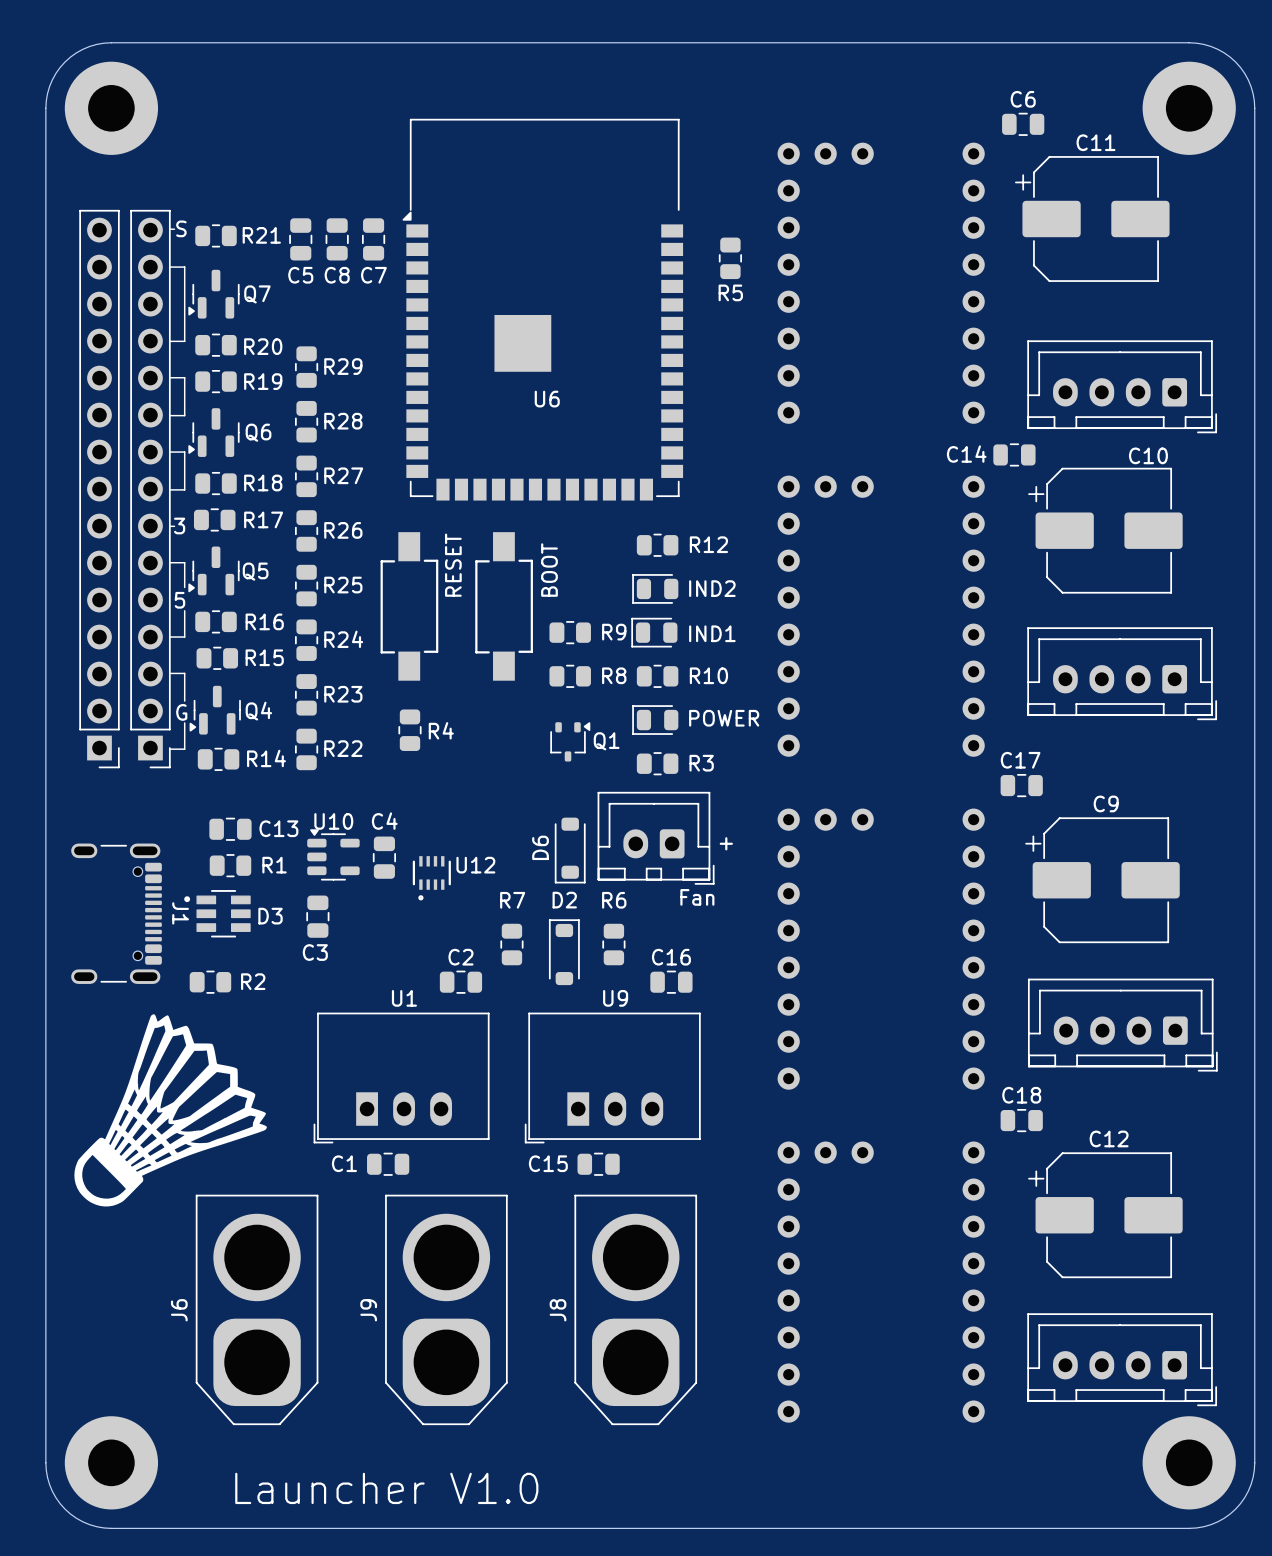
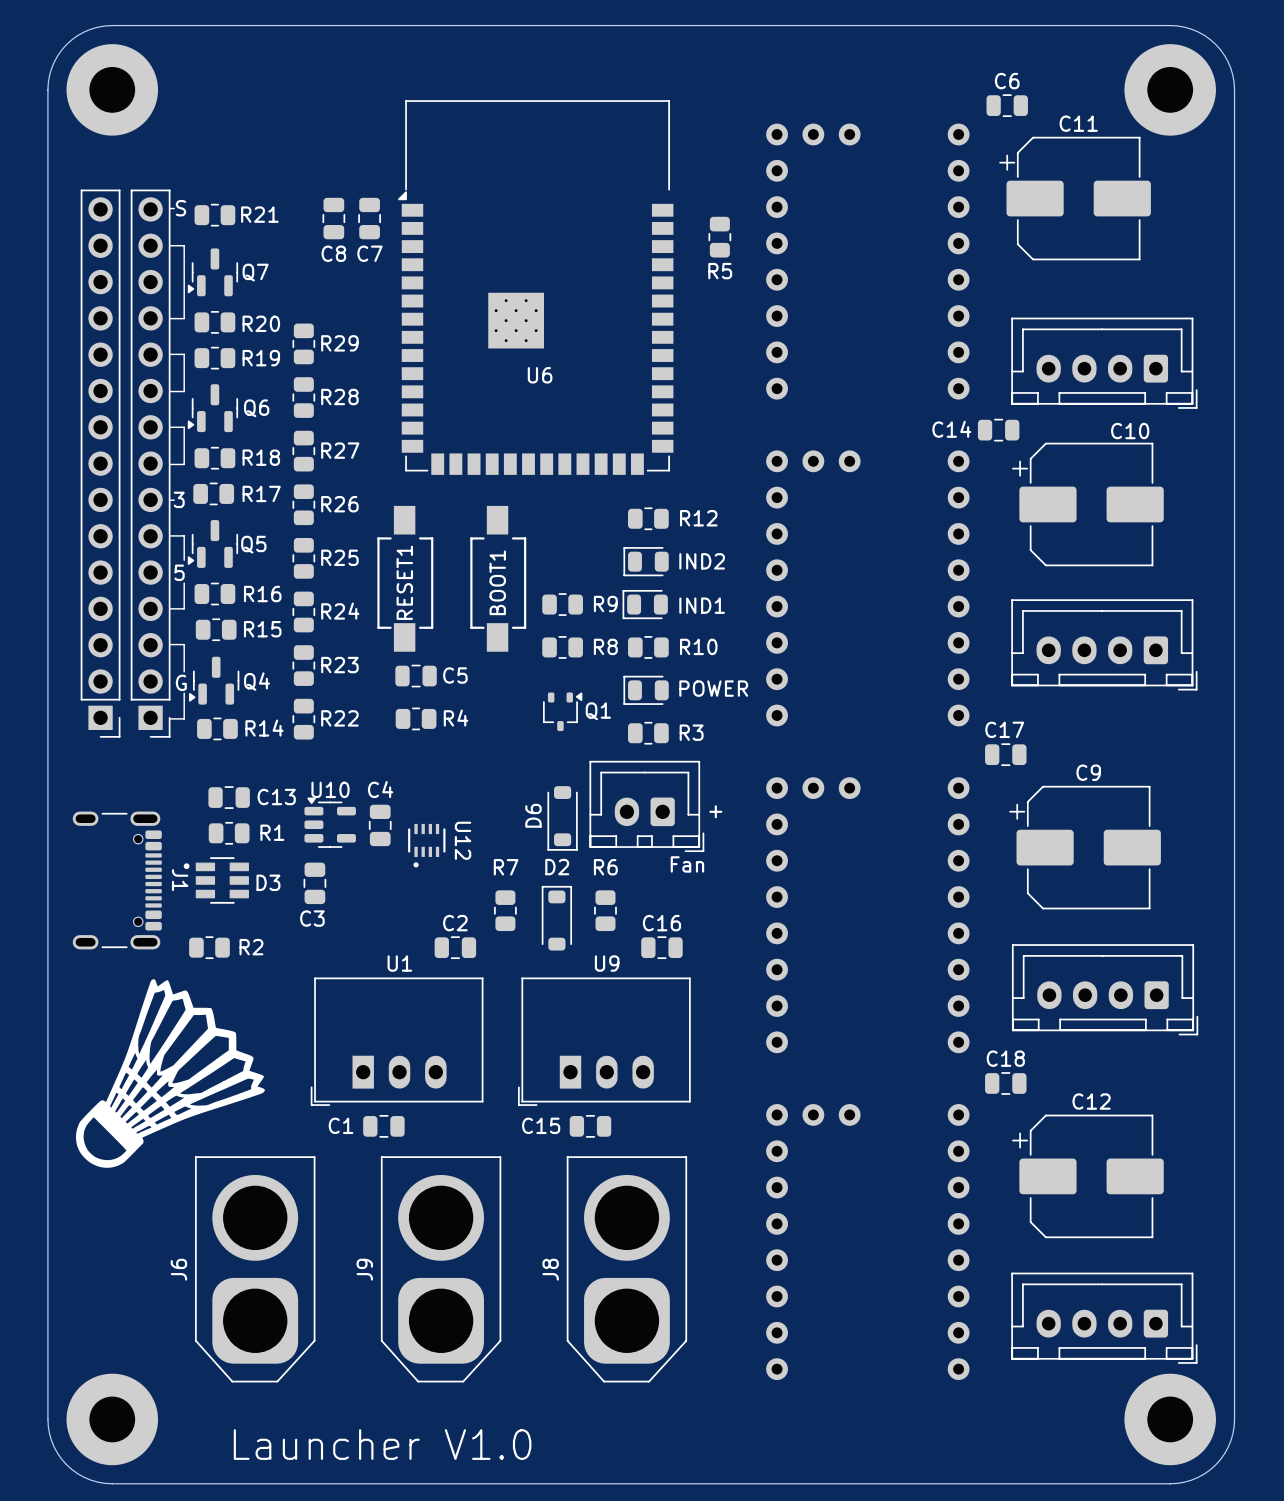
U6 footprint: [402, 118, 684, 501] -> [398, 100, 674, 475]
C5 rotation: 0° (300, 239) -> 90° clockwise (416, 676)
C5 position: (300, 239) -> (416, 676)
C5 name position: C5 (300, 275) -> C5 (455, 675)
text: RESET (453, 565) -> none
text: BOOT (549, 570) -> none
part: (409, 606) -> none
RESET1: none -> (405, 578)
part: (504, 606) -> none
BOOT1: none -> (498, 578)
R4 rotation: 0° (409, 730) -> 90° clockwise (416, 718)
U12 name rotation: 0° (475, 865) -> 90° clockwise (463, 840)

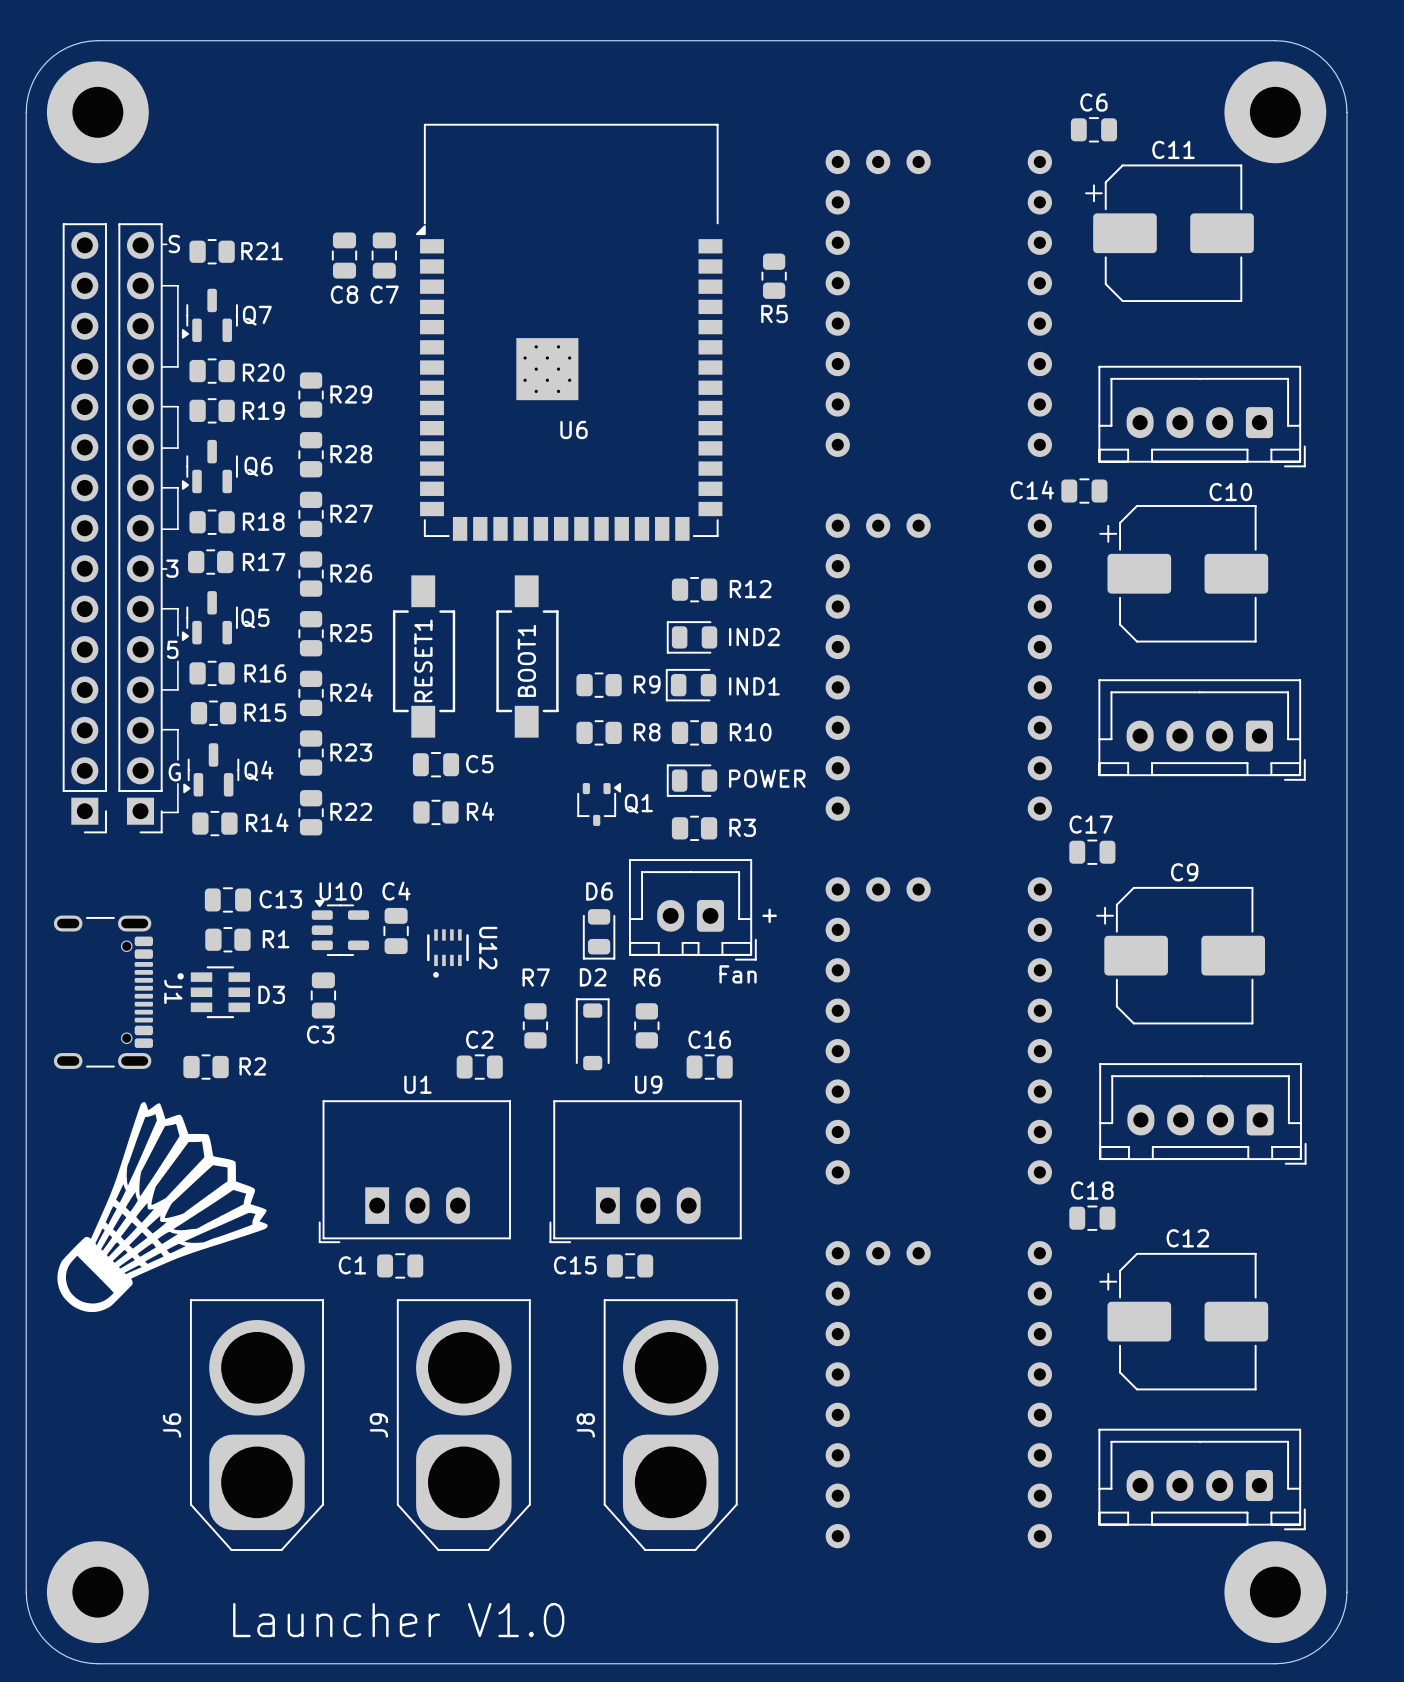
D6 footprint: [547, 786, 578, 851] -> [582, 909, 616, 960]
D6 name position: D6 (533, 815) -> D6 (599, 891)

